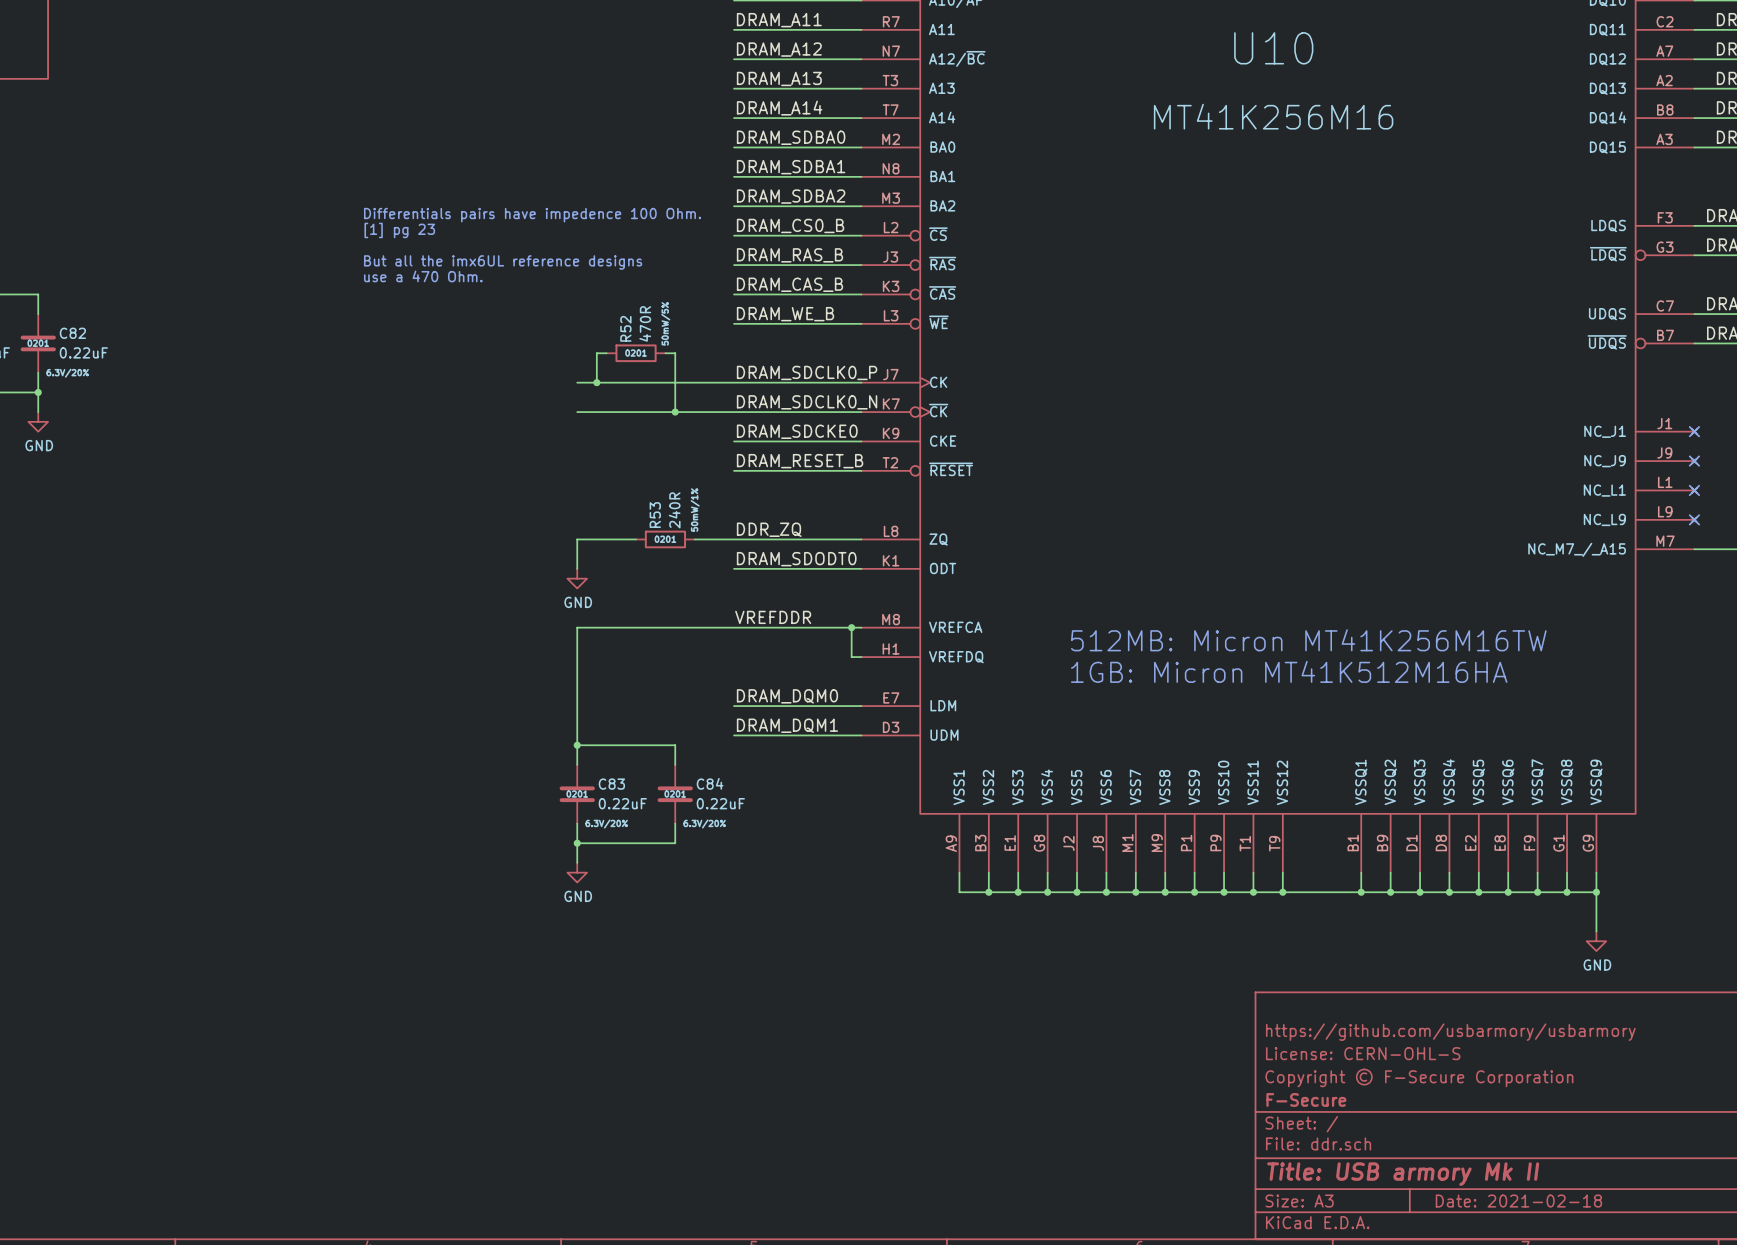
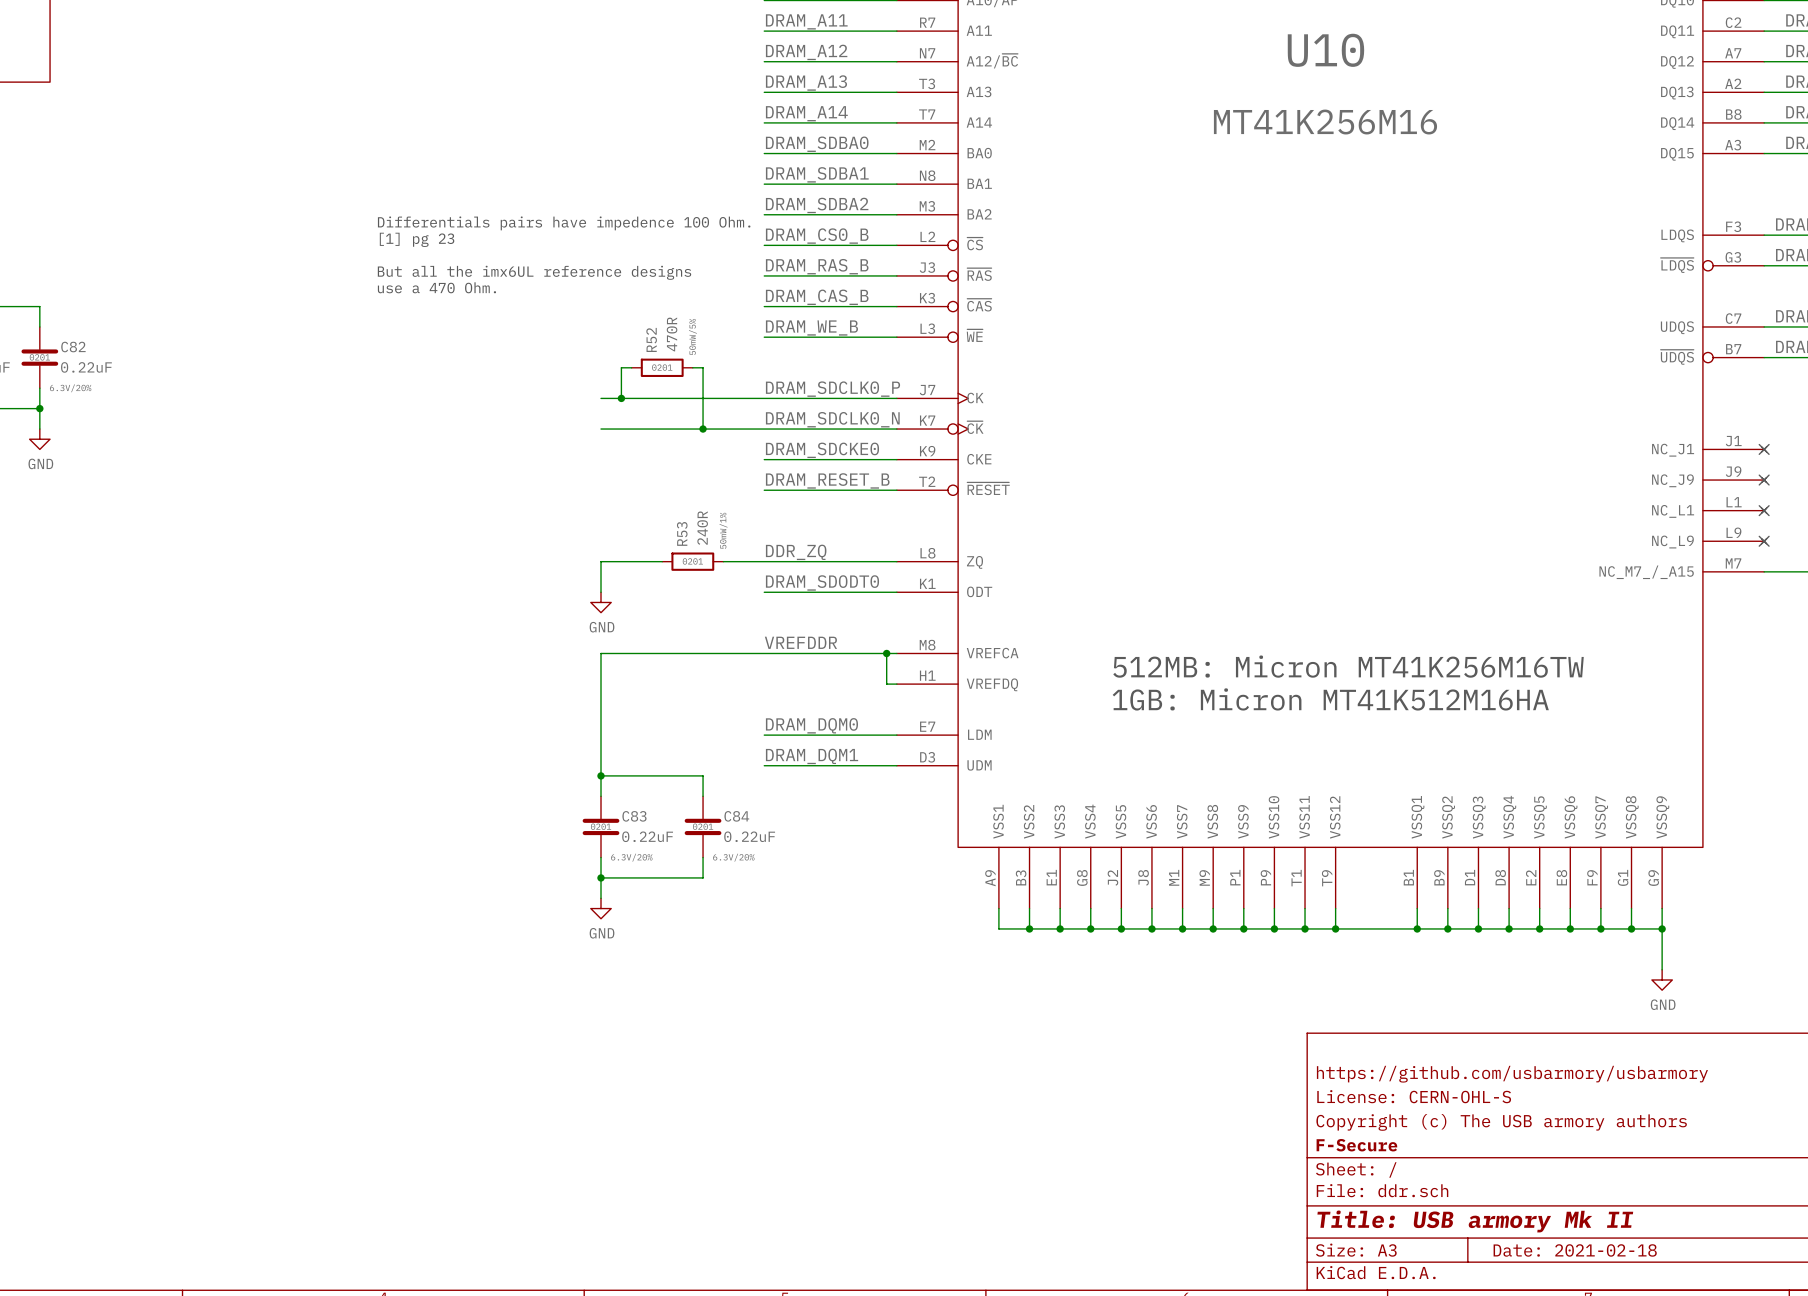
title block: Copyright © F-Secure Corporation (1419, 1077) -> Copyright (c) The USB armory authors (1501, 1122)

